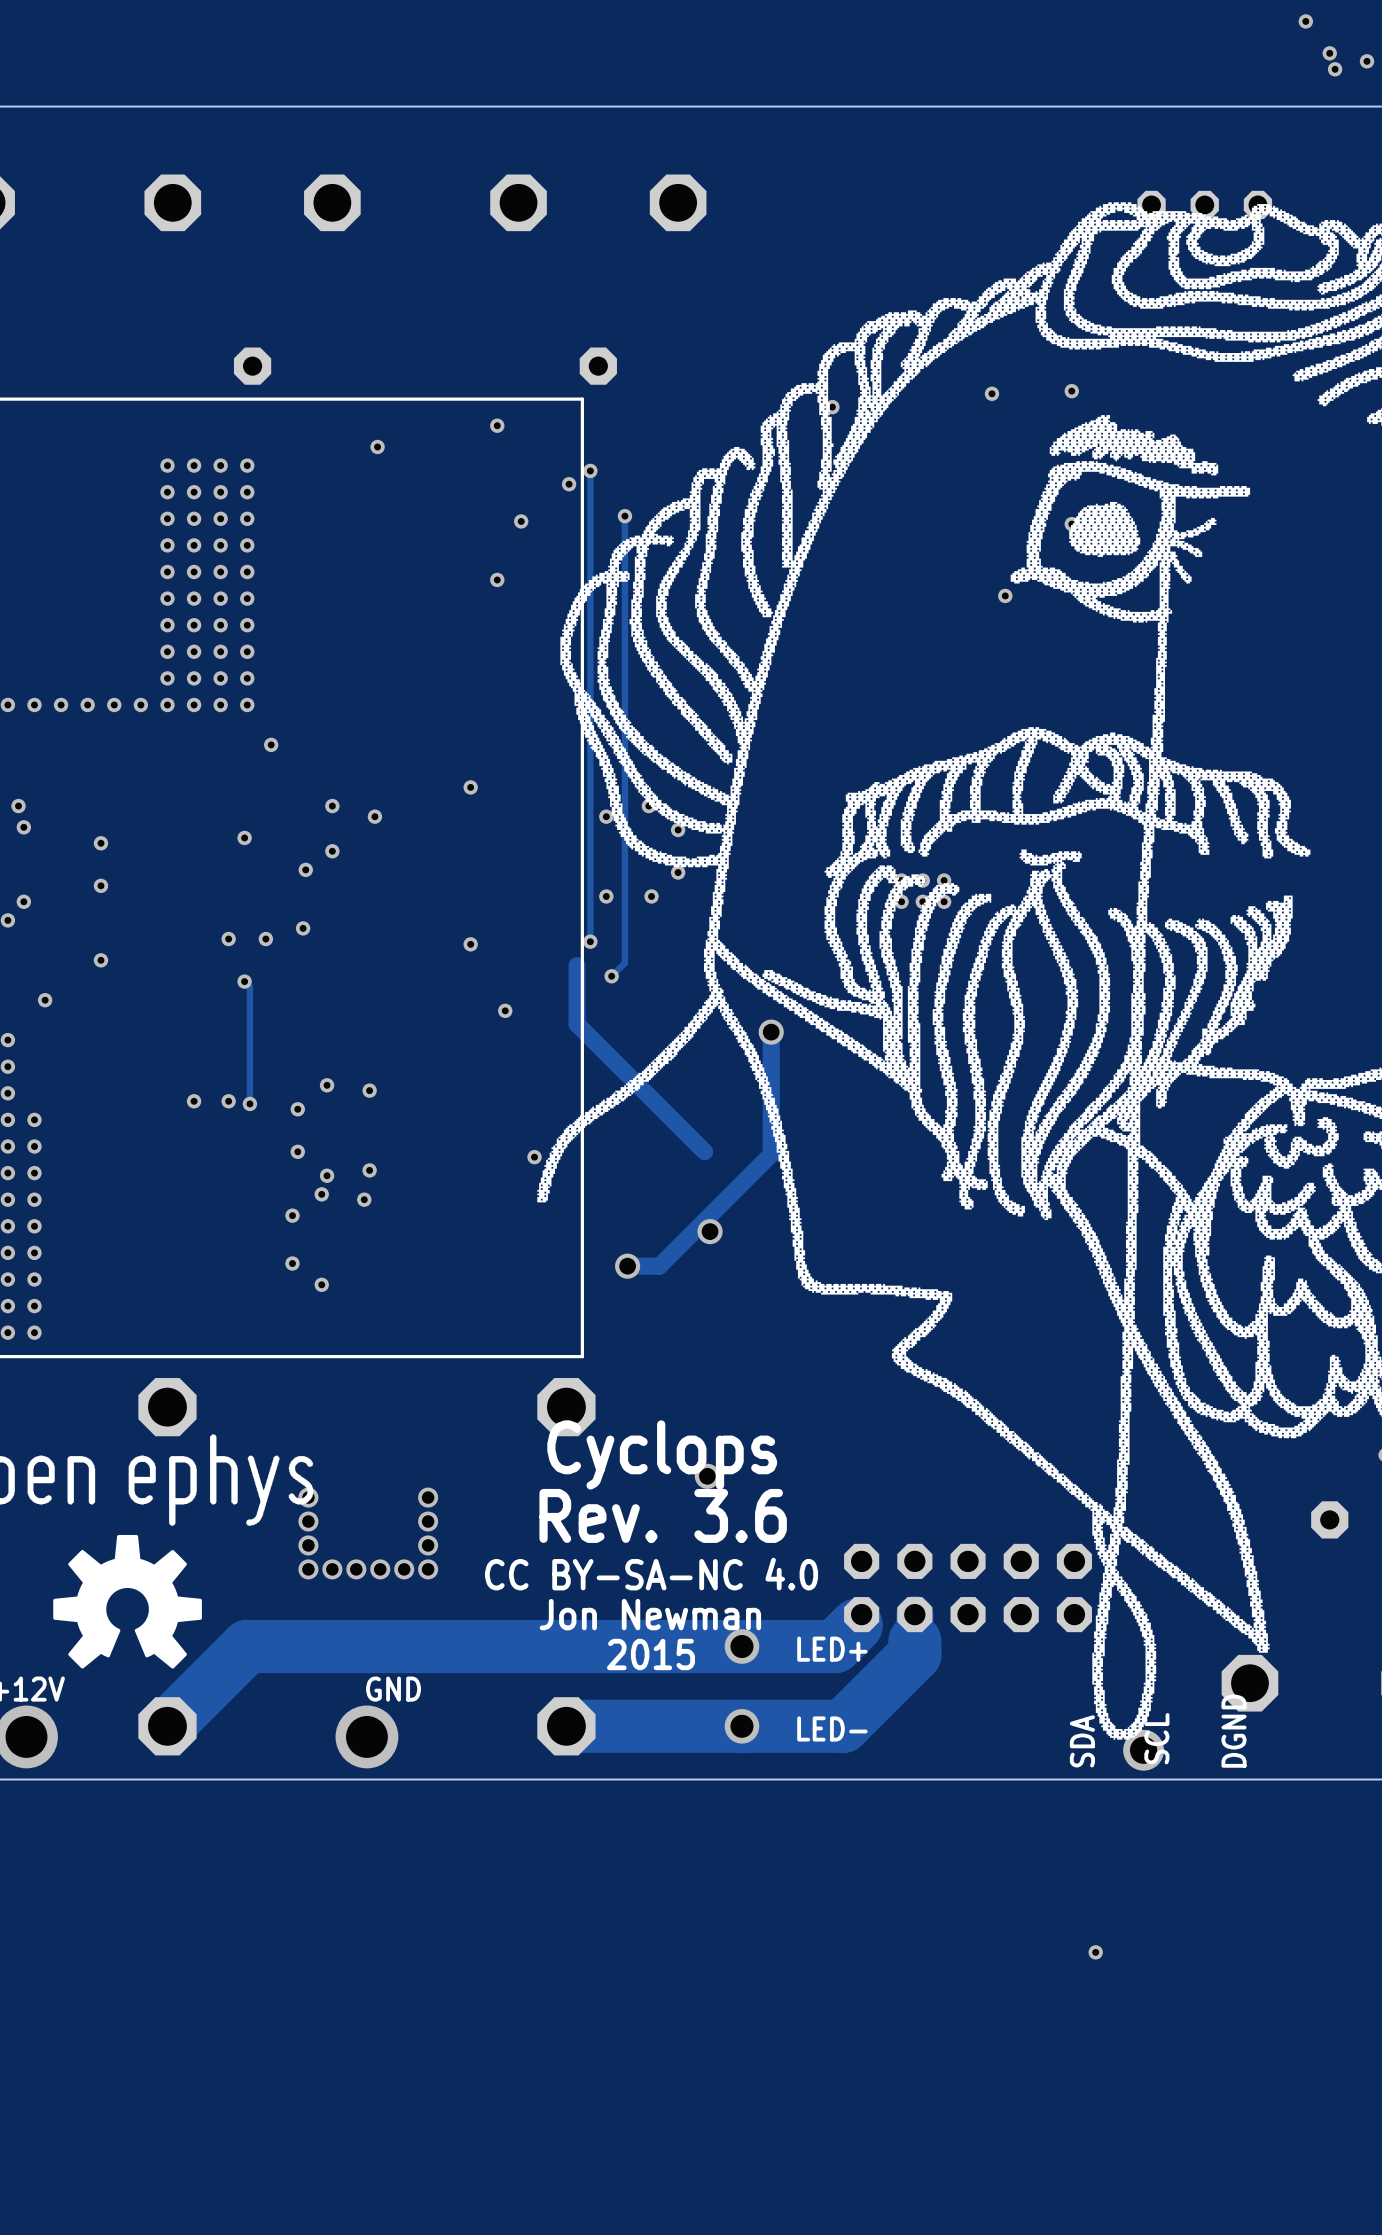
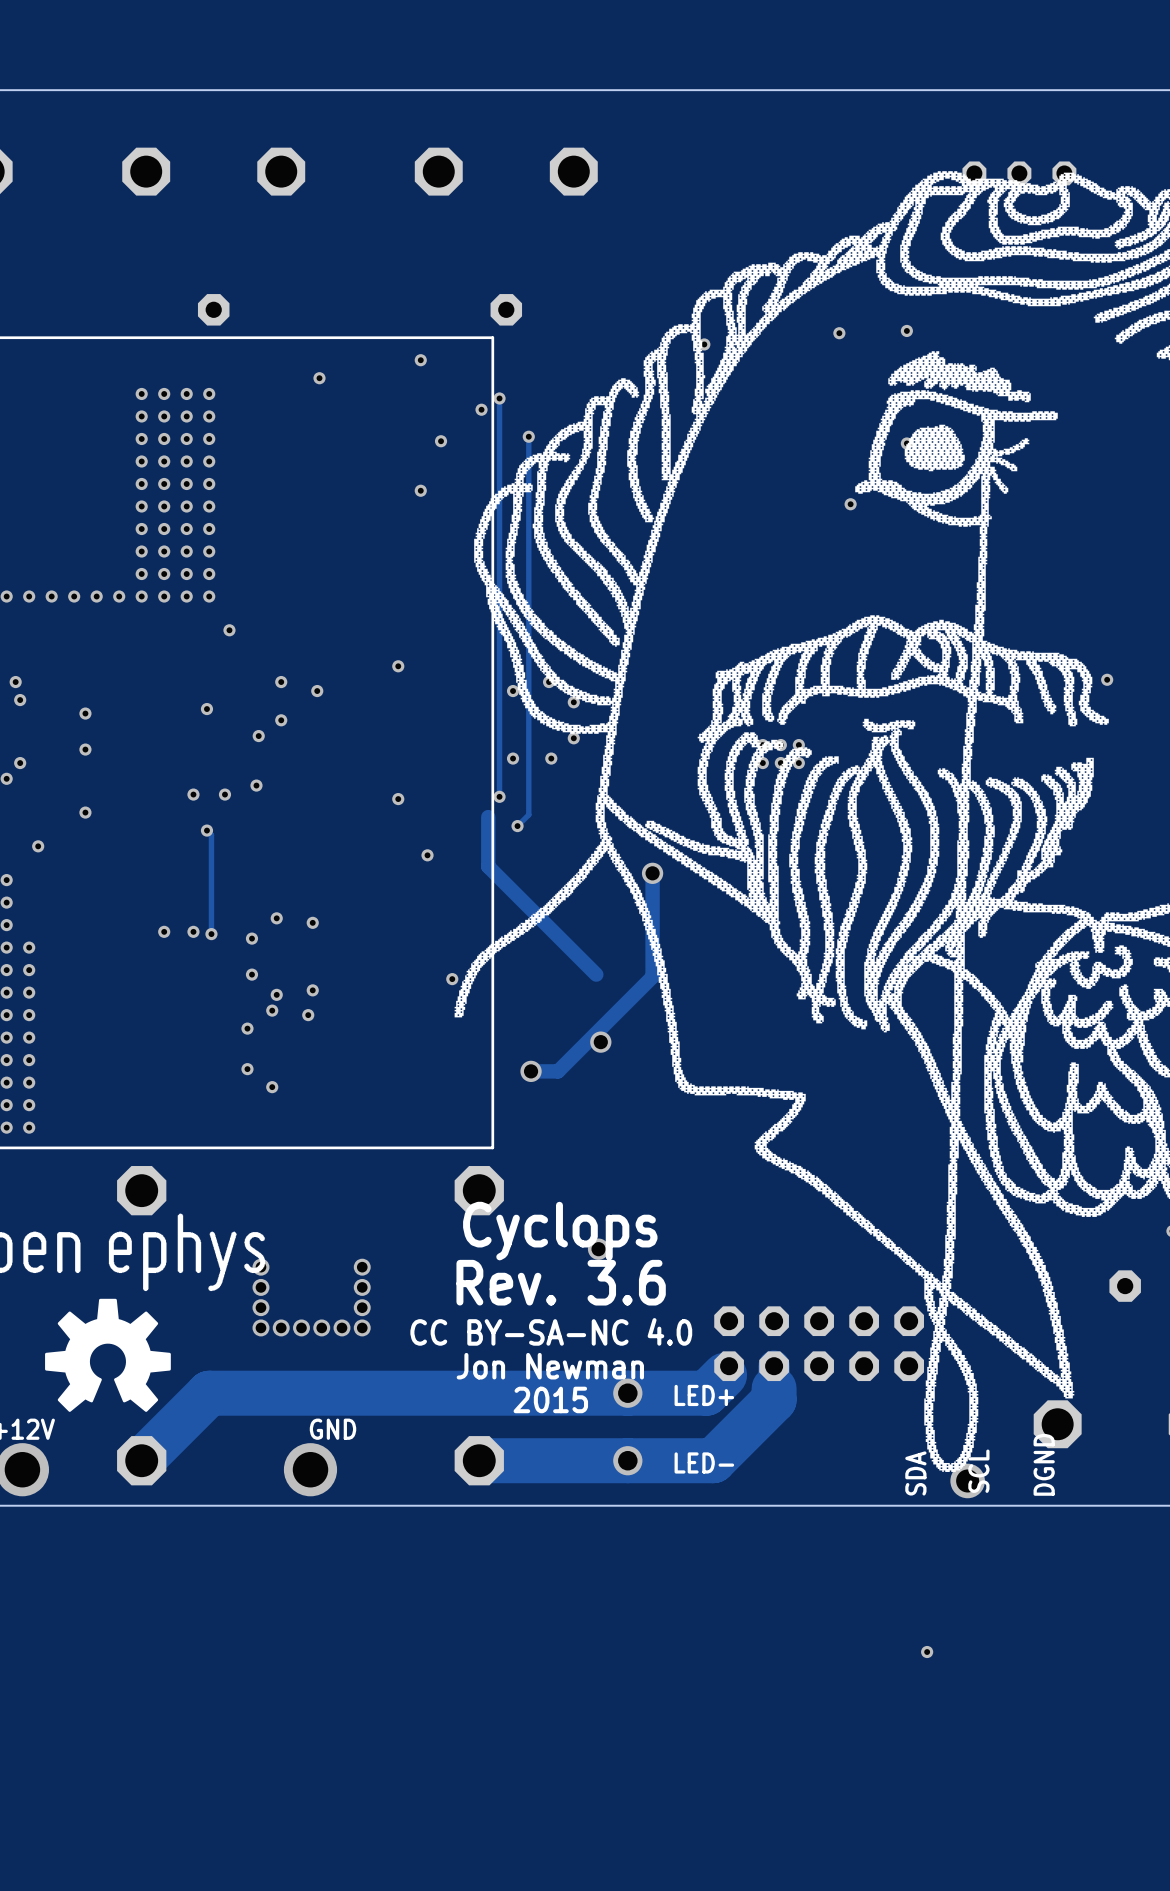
via: (1305, 21) -> none
via: (1329, 53) -> none
via: (1367, 61) -> none
via: (1335, 69) -> none
via: none -> (1107, 679)

